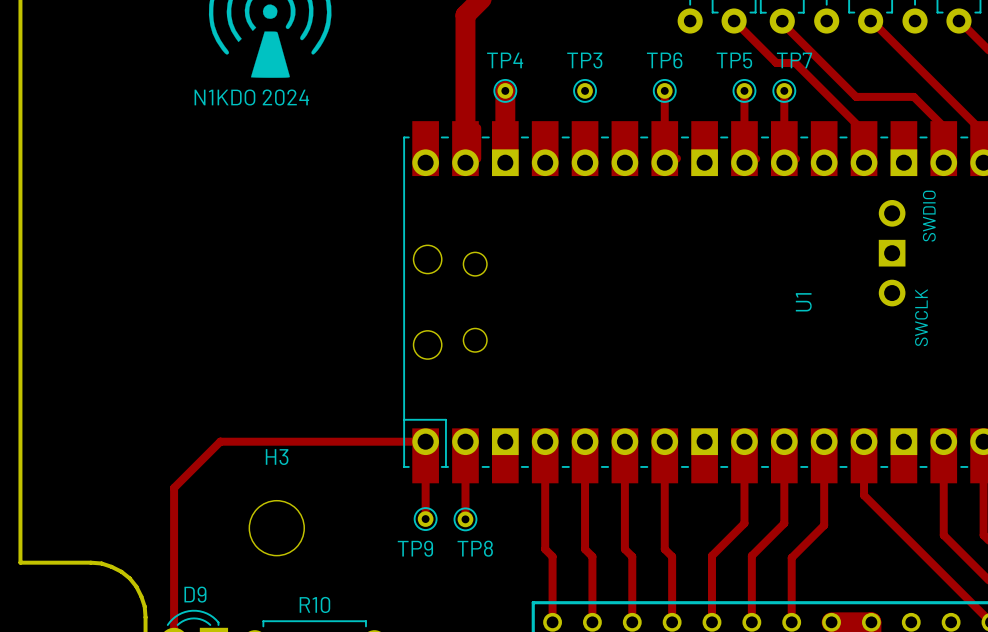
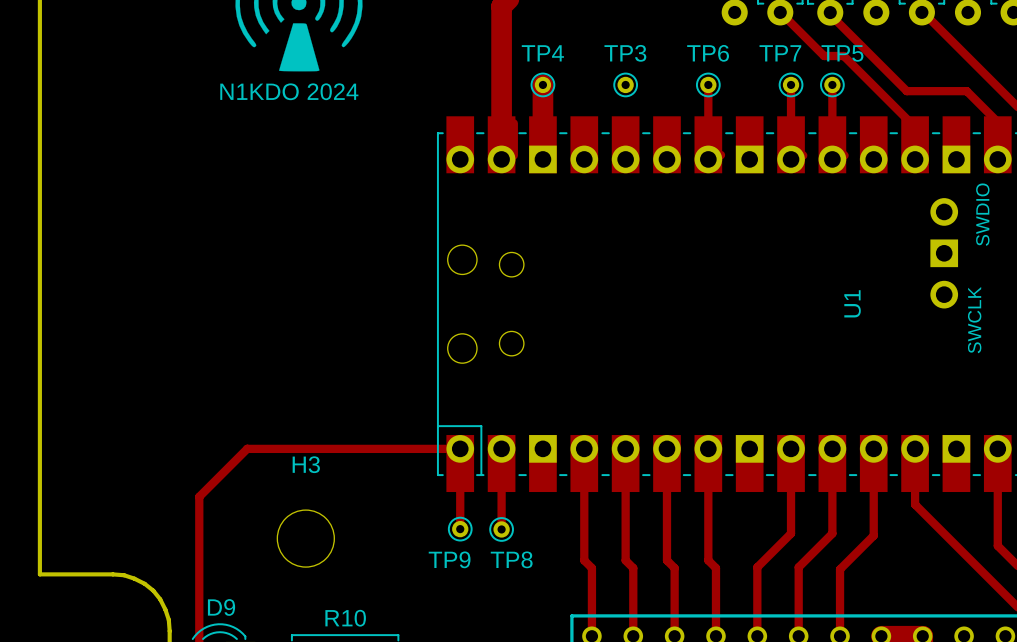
TP5 name: TP5 (734, 60) -> TP7 (780, 53)
TP7 name: TP7 (794, 60) -> TP5 (842, 53)

